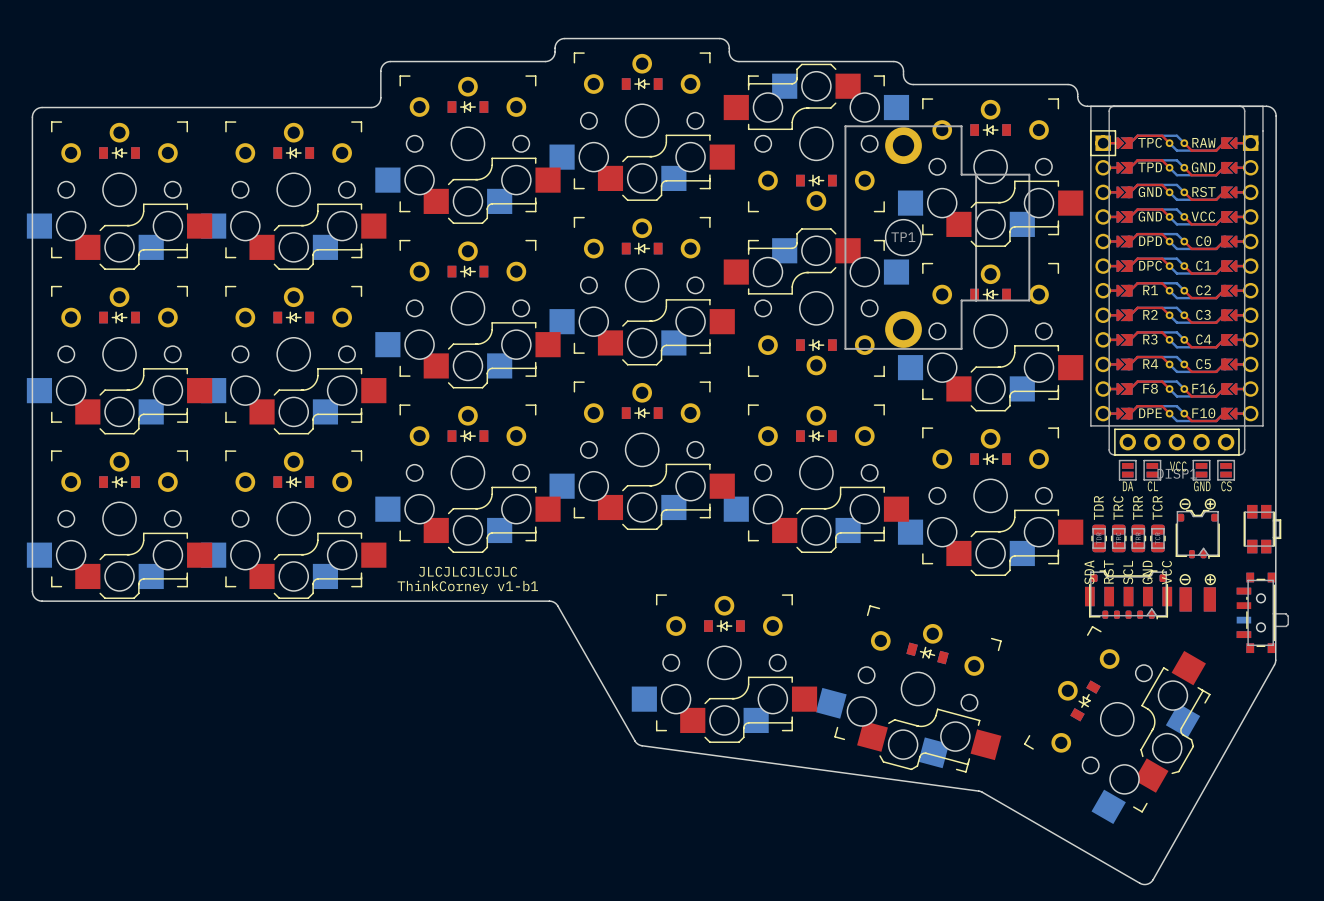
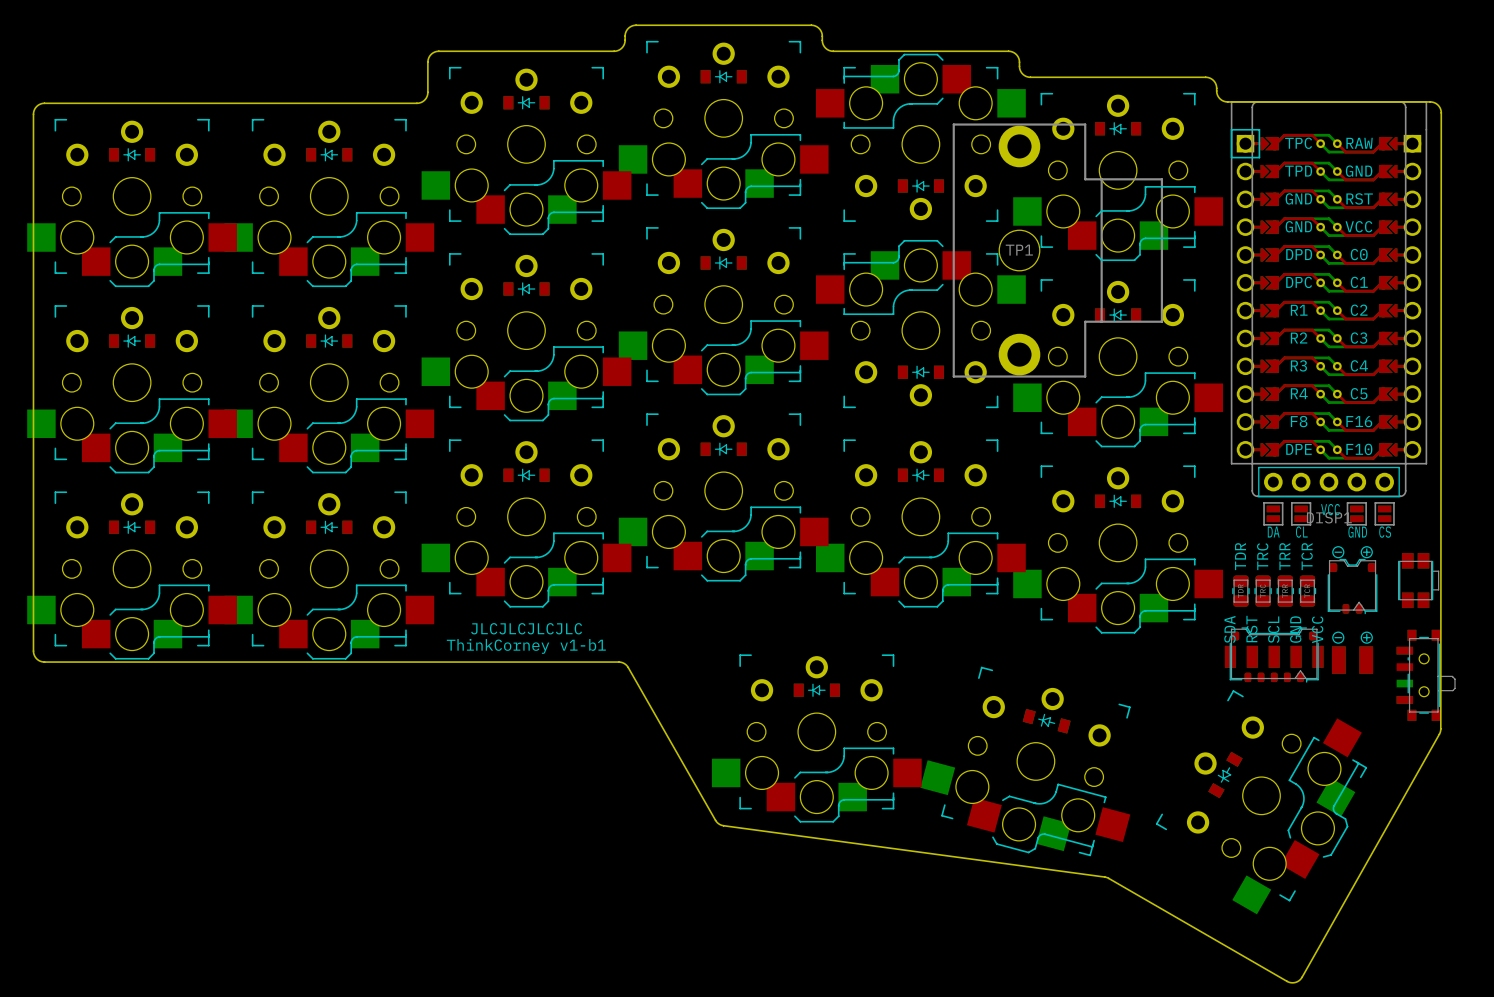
part footprint: [1243, 504, 1282, 554] -> [1397, 553, 1440, 608]

